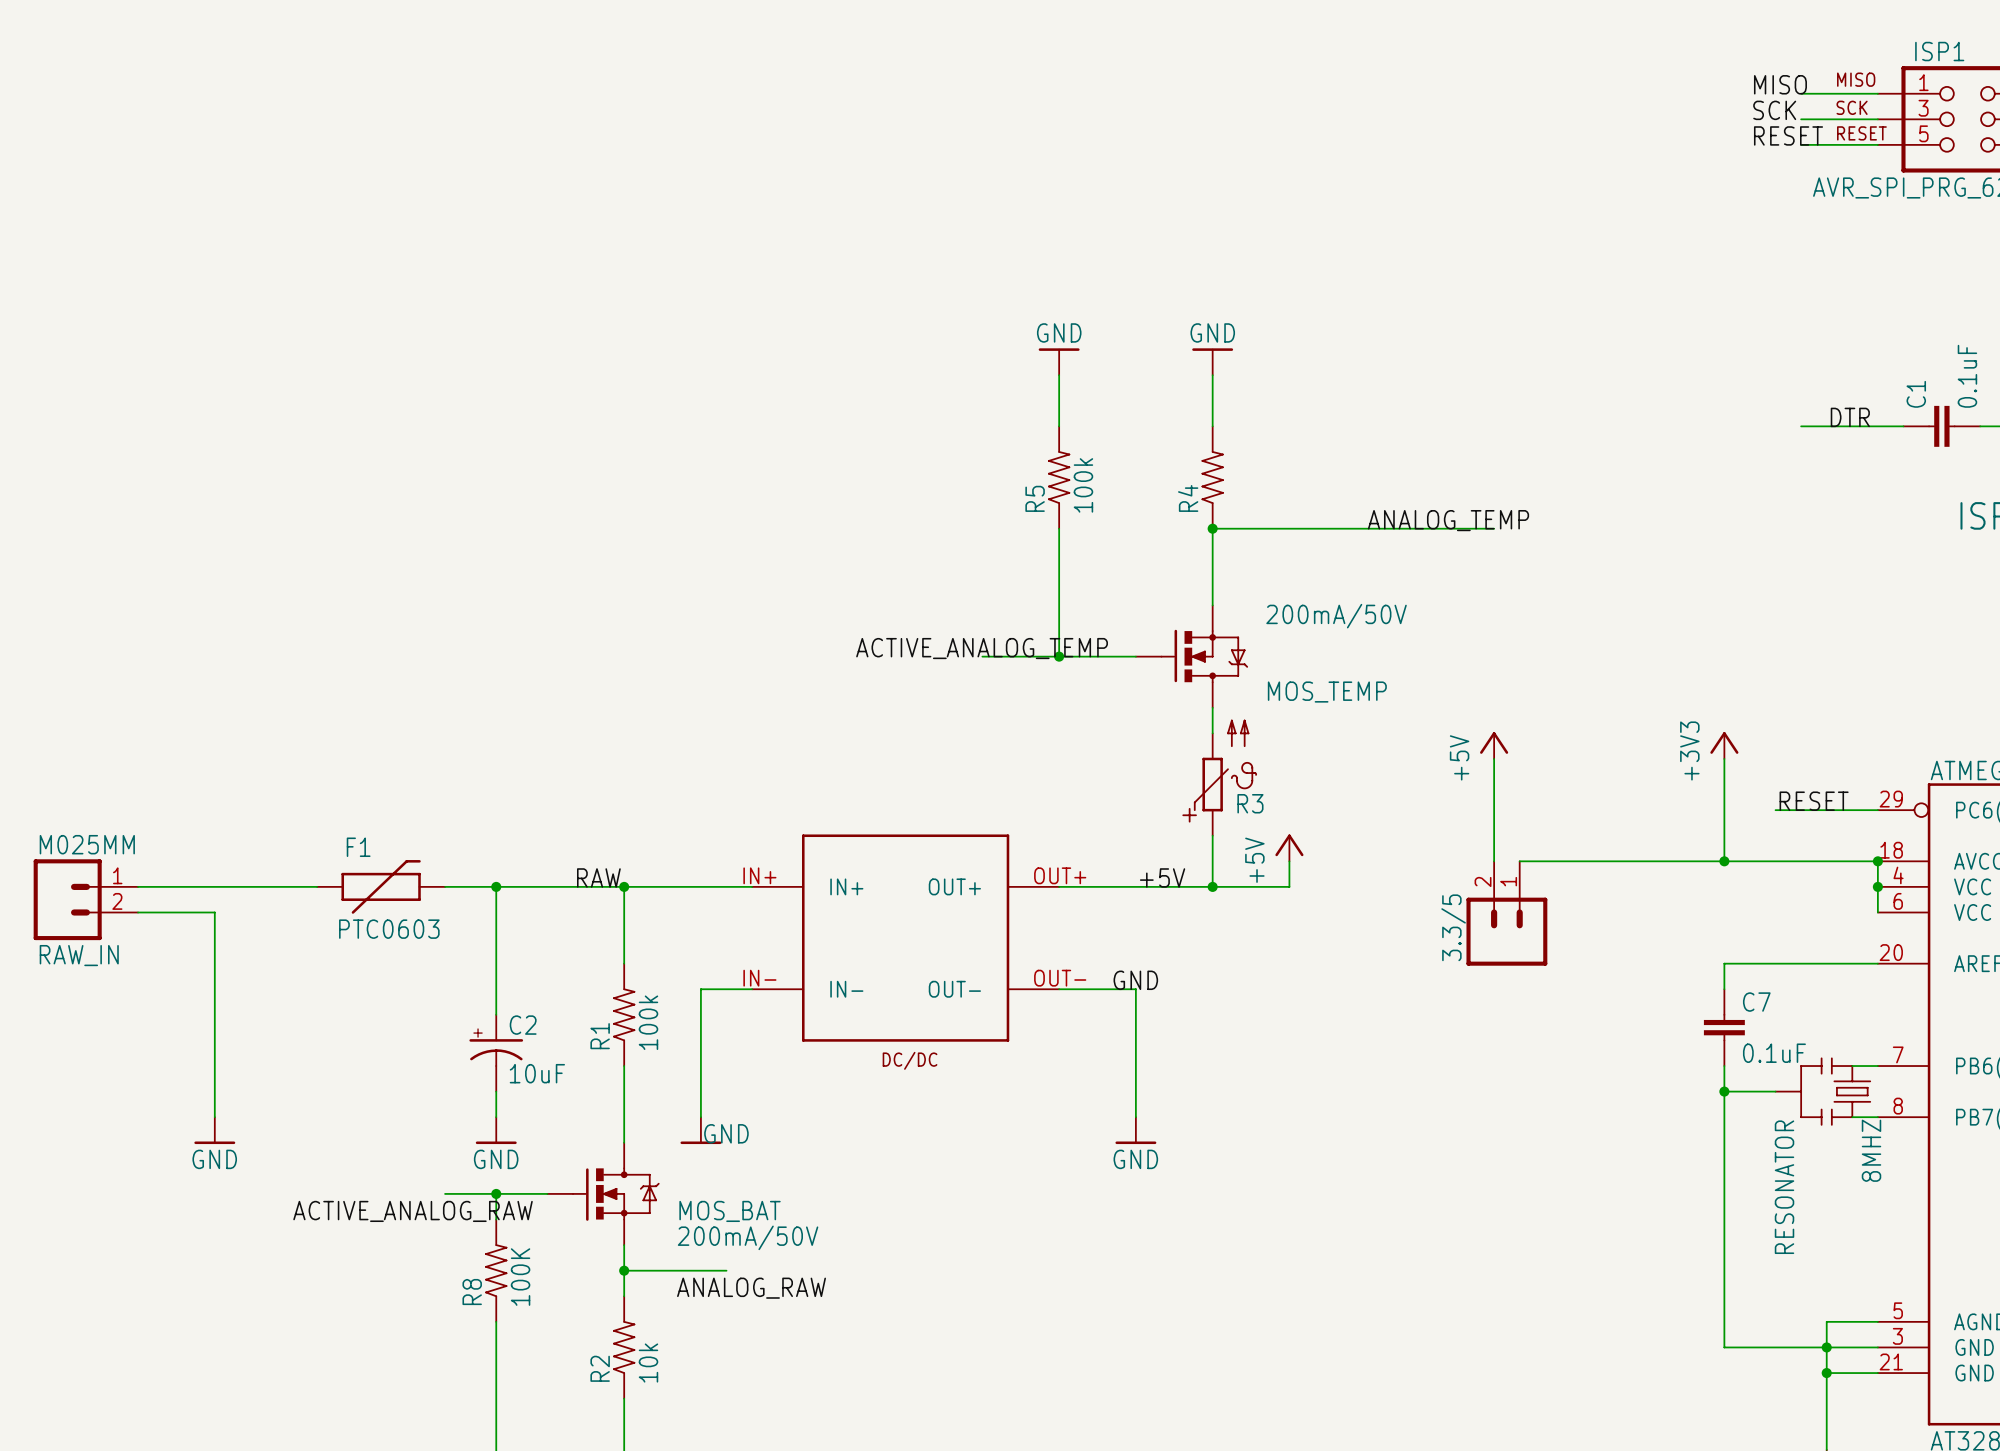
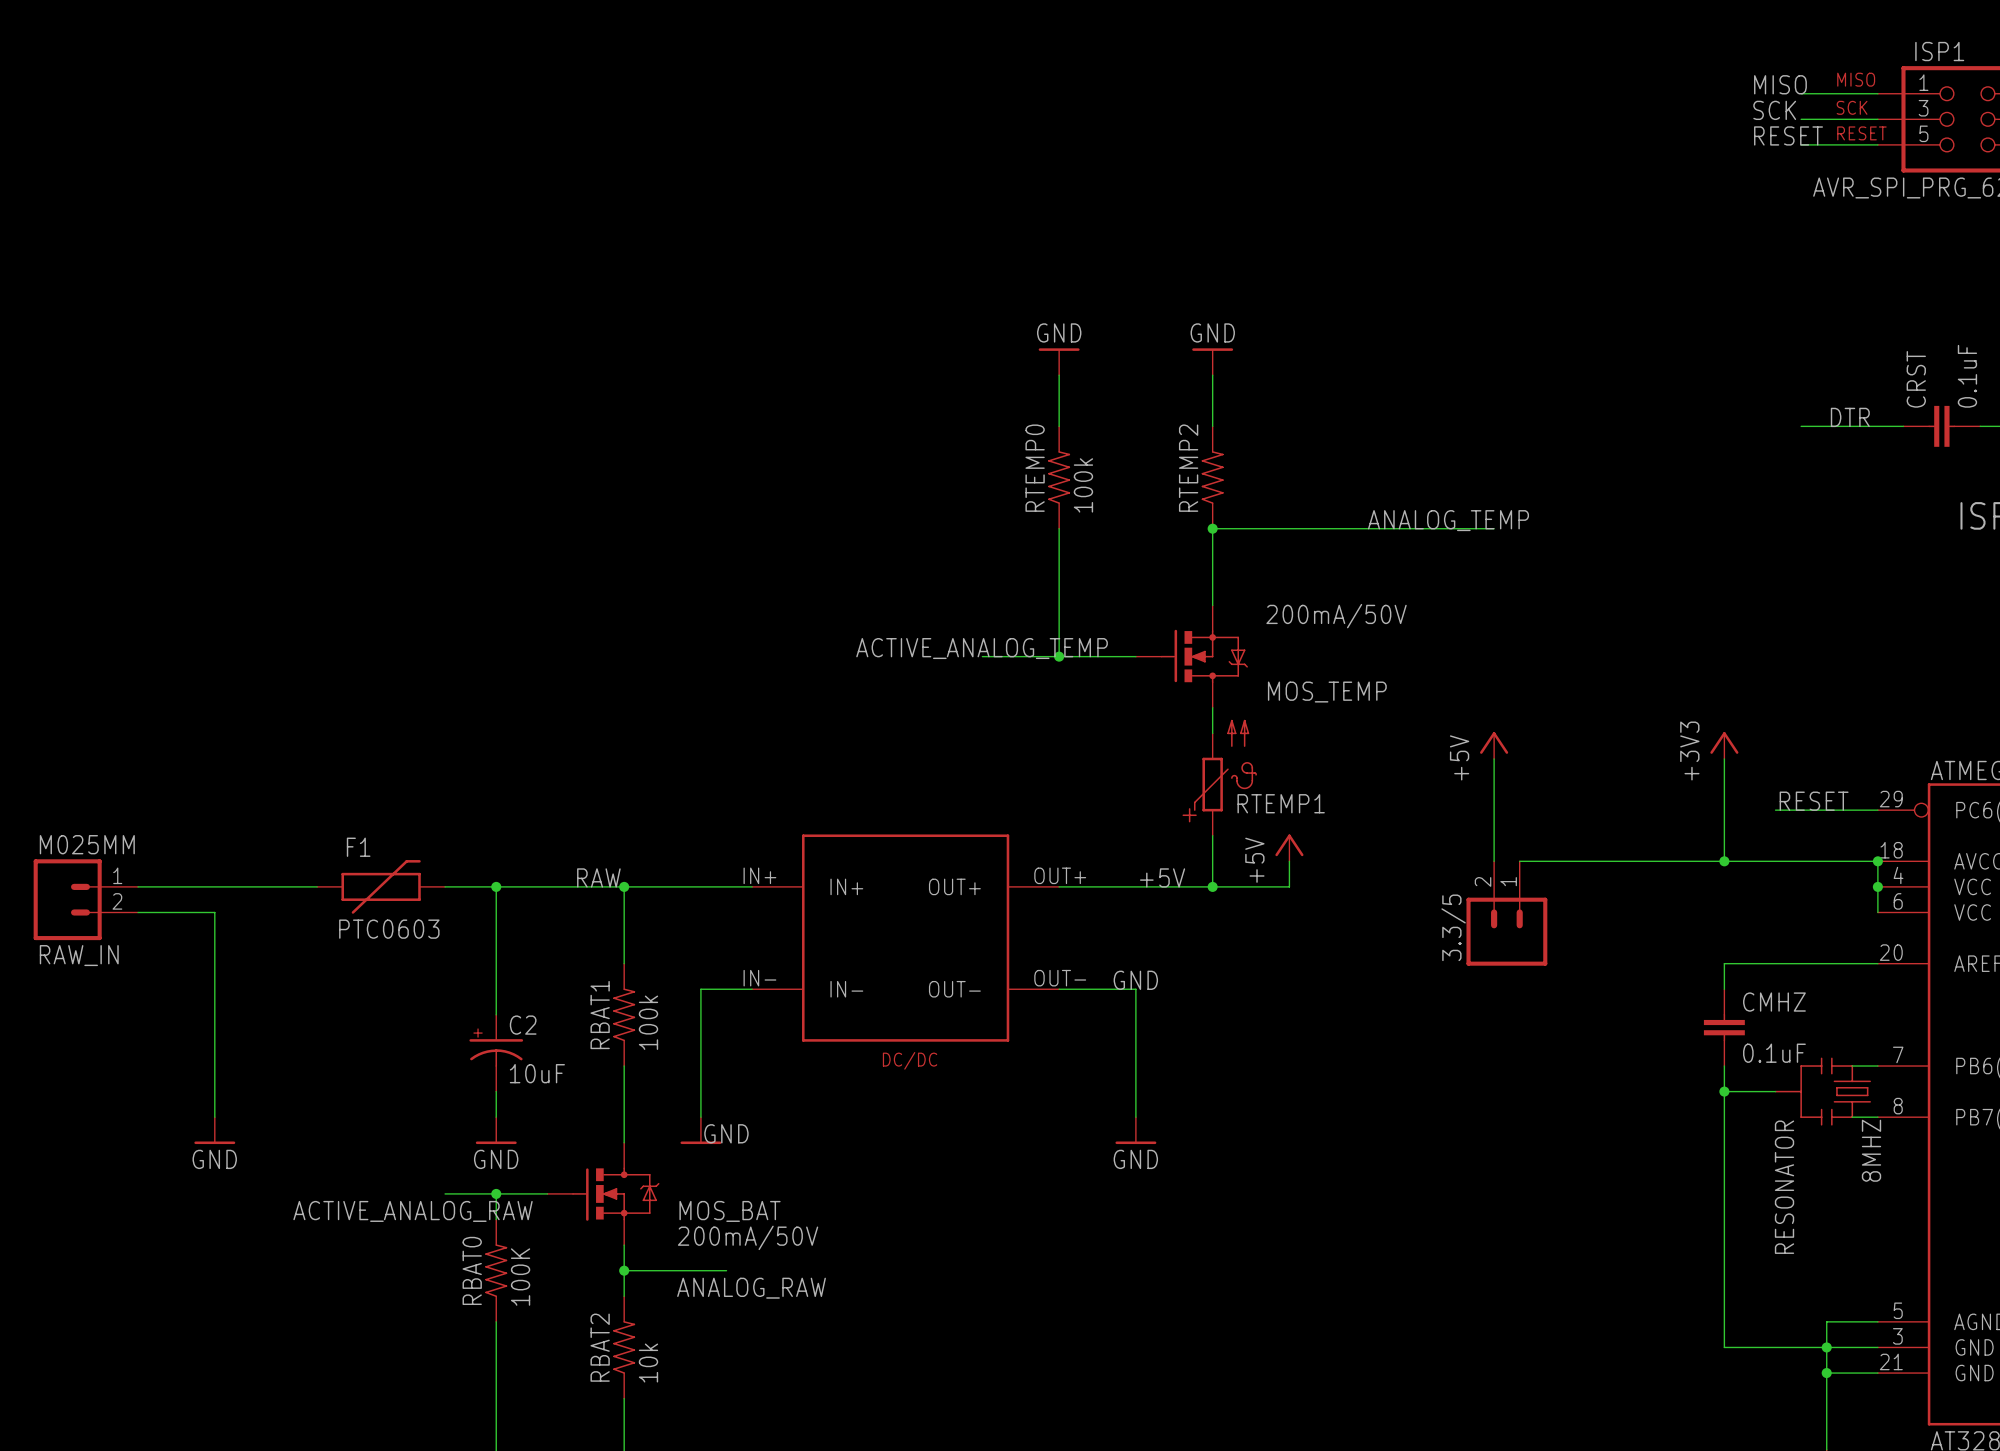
C1 name: C1 (1916, 394) -> CRST (1916, 379)
R5 name: R5 (1035, 498) -> RTEMP0 (1035, 468)
R4 name: R4 (1188, 498) -> RTEMP2 (1188, 468)
R3 name: R3 (1250, 803) -> RTEMP1 (1281, 803)
C7 name: C7 (1756, 1002) -> CMHZ (1774, 1002)
R1 name: R1 (600, 1036) -> RBAT1 (600, 1015)
R8 name: R8 (472, 1292) -> RBAT0 (472, 1270)
R2 name: R2 (600, 1368) -> RBAT2 (600, 1347)

